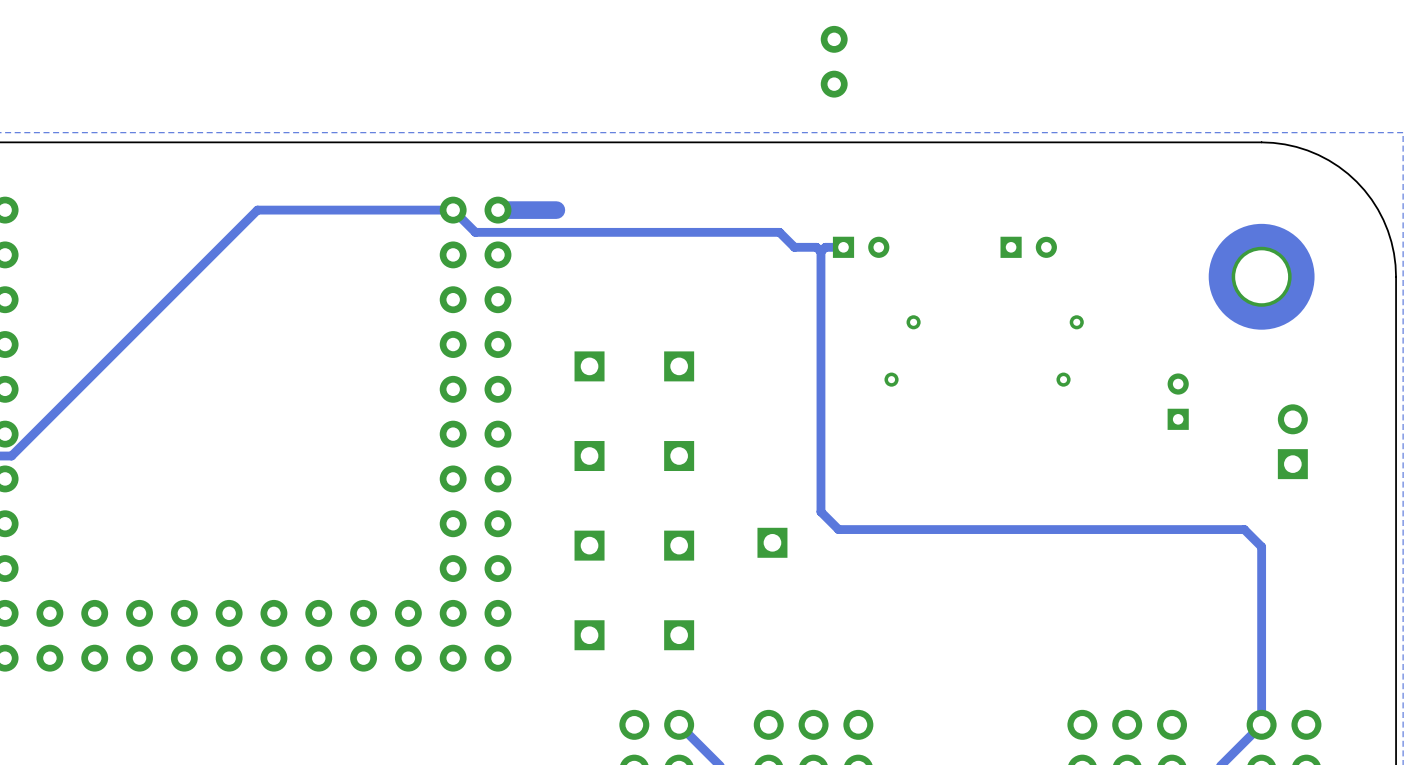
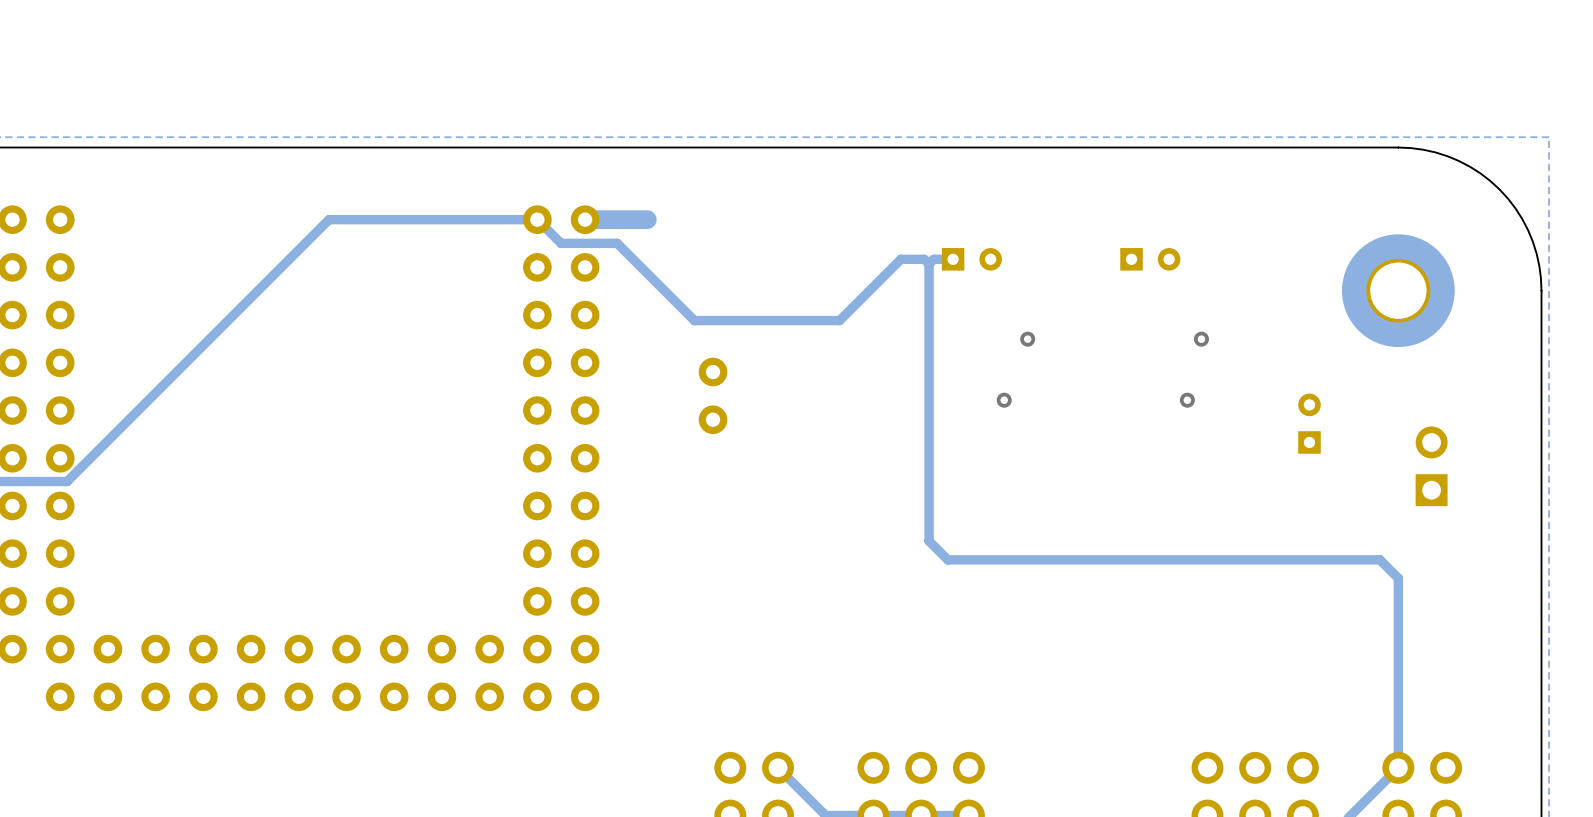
part position: (834, 61) -> (713, 395)
track: (528, 232) (779, 232) (794, 247) -> (617, 243) (694, 320) (839, 320) (900, 259)
part: (589, 366) -> none
part: (679, 366) -> none
part: (589, 456) -> none
part: (679, 456) -> none
part: (772, 542) -> none
part: (589, 545) -> none
part: (679, 545) -> none
part: (589, 635) -> none
part: (679, 635) -> none

